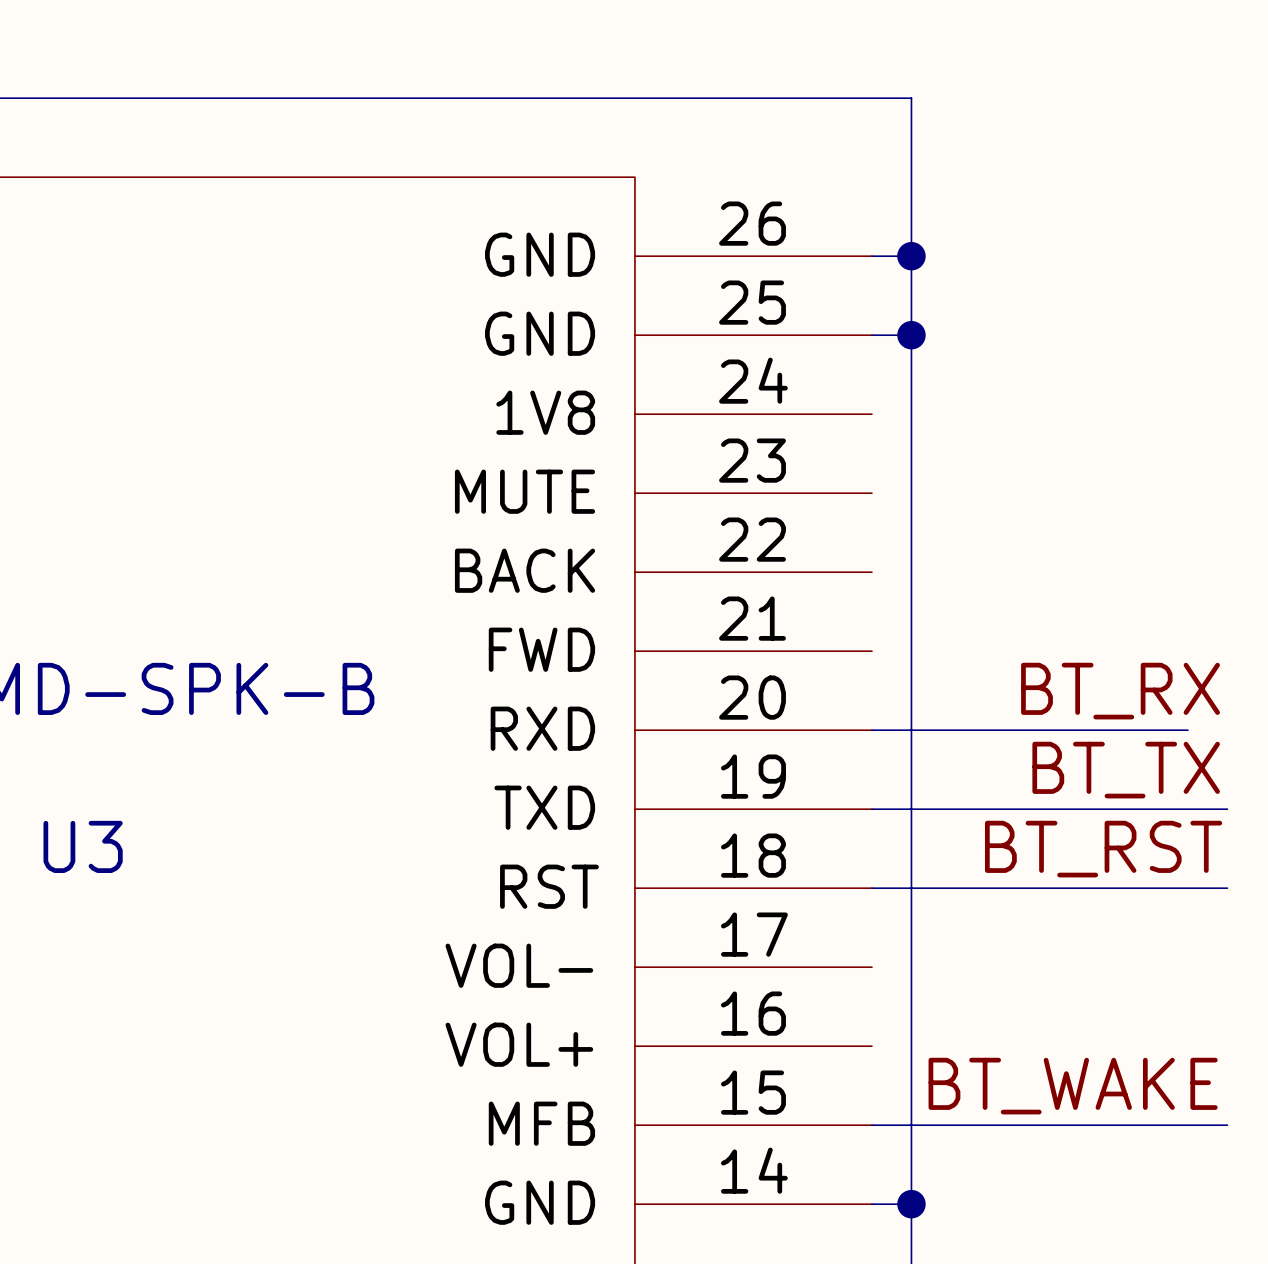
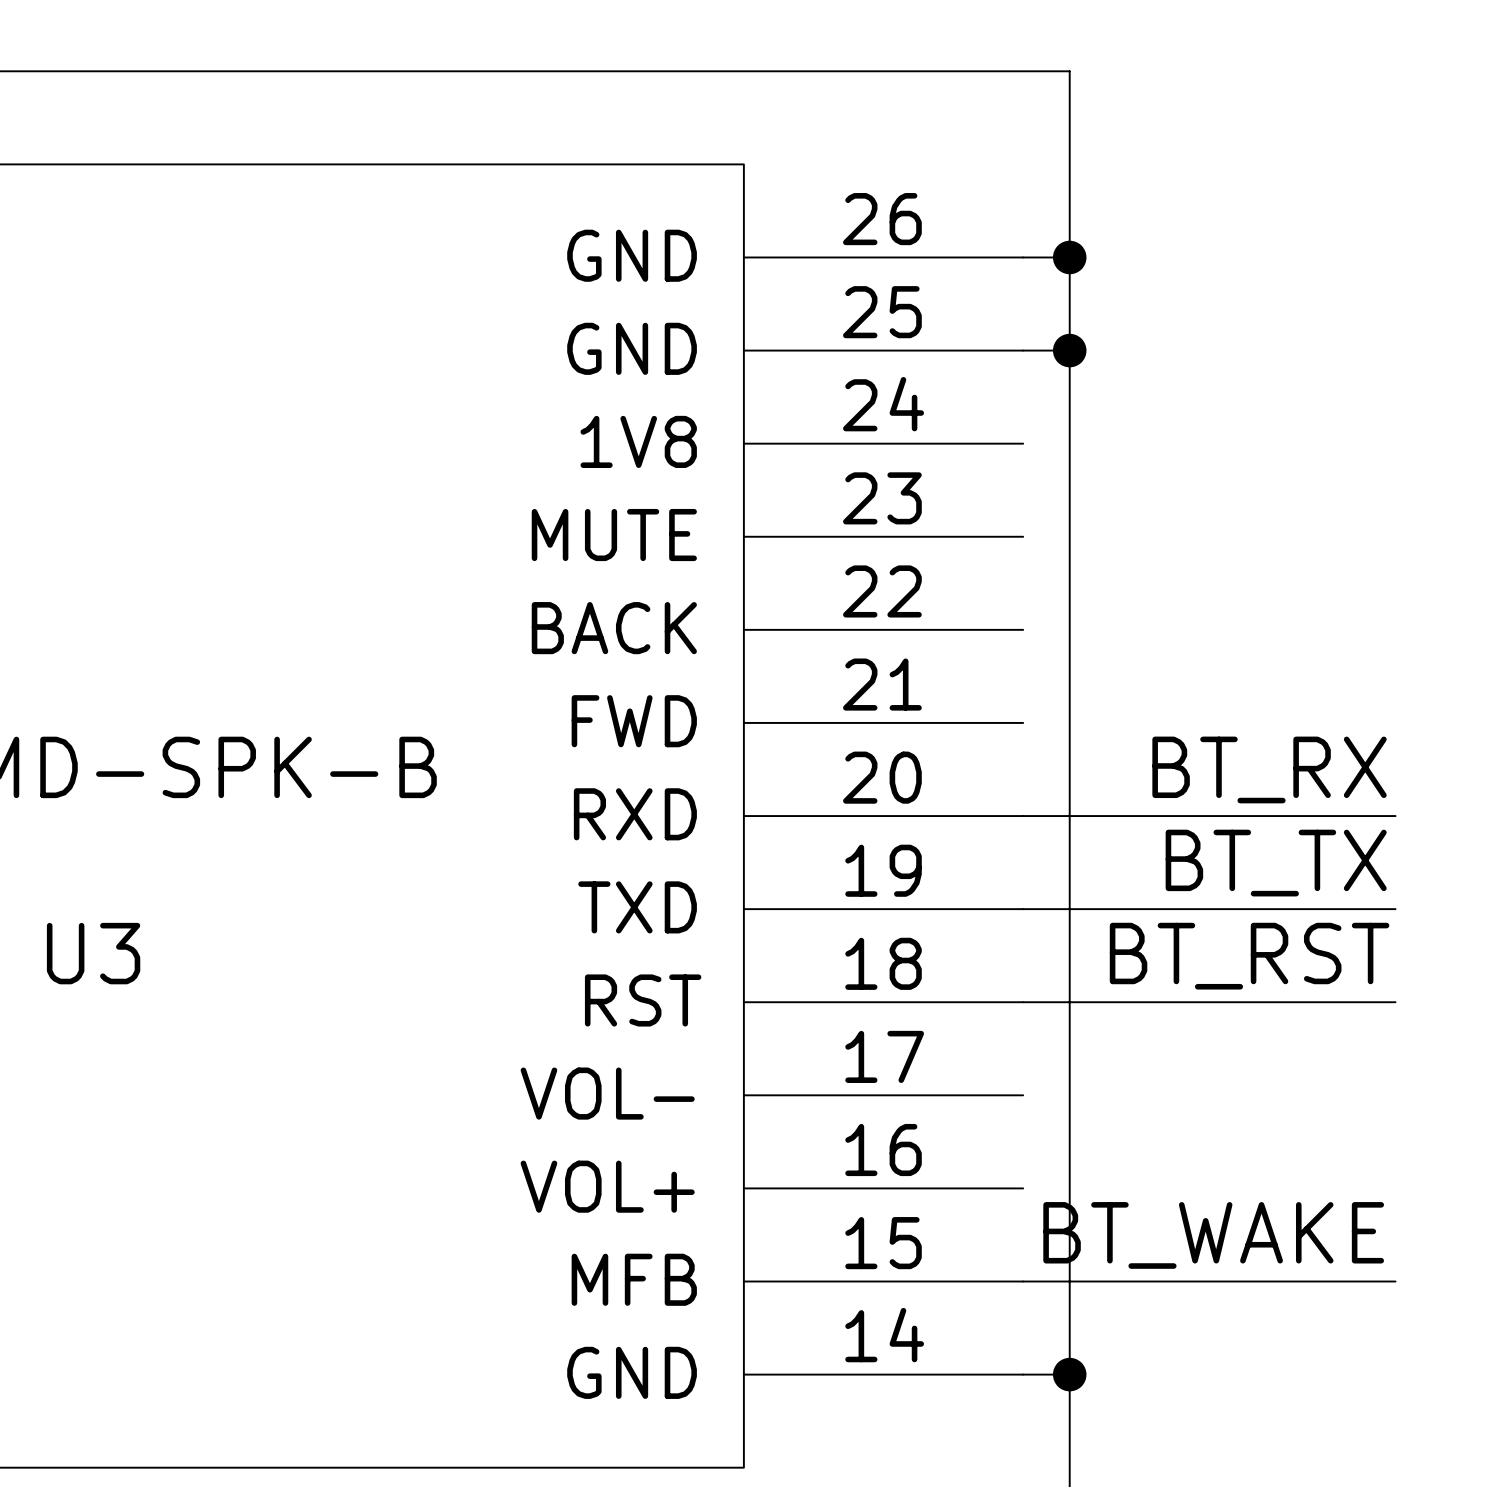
label position: BT_RX (1120, 691) -> BT_RX (1269, 769)
label position: BT_TX (1126, 770) -> BT_TX (1276, 863)
wire: (1187, 809) (1227, 809) -> none
label position: BT_RST (1103, 849) -> BT_RST (1249, 956)
wire: (1187, 888) (1227, 888) -> none
label position: BT_WAKE (1073, 1086) -> BT_WAKE (1213, 1235)
wire: (1187, 1125) (1227, 1125) -> none

